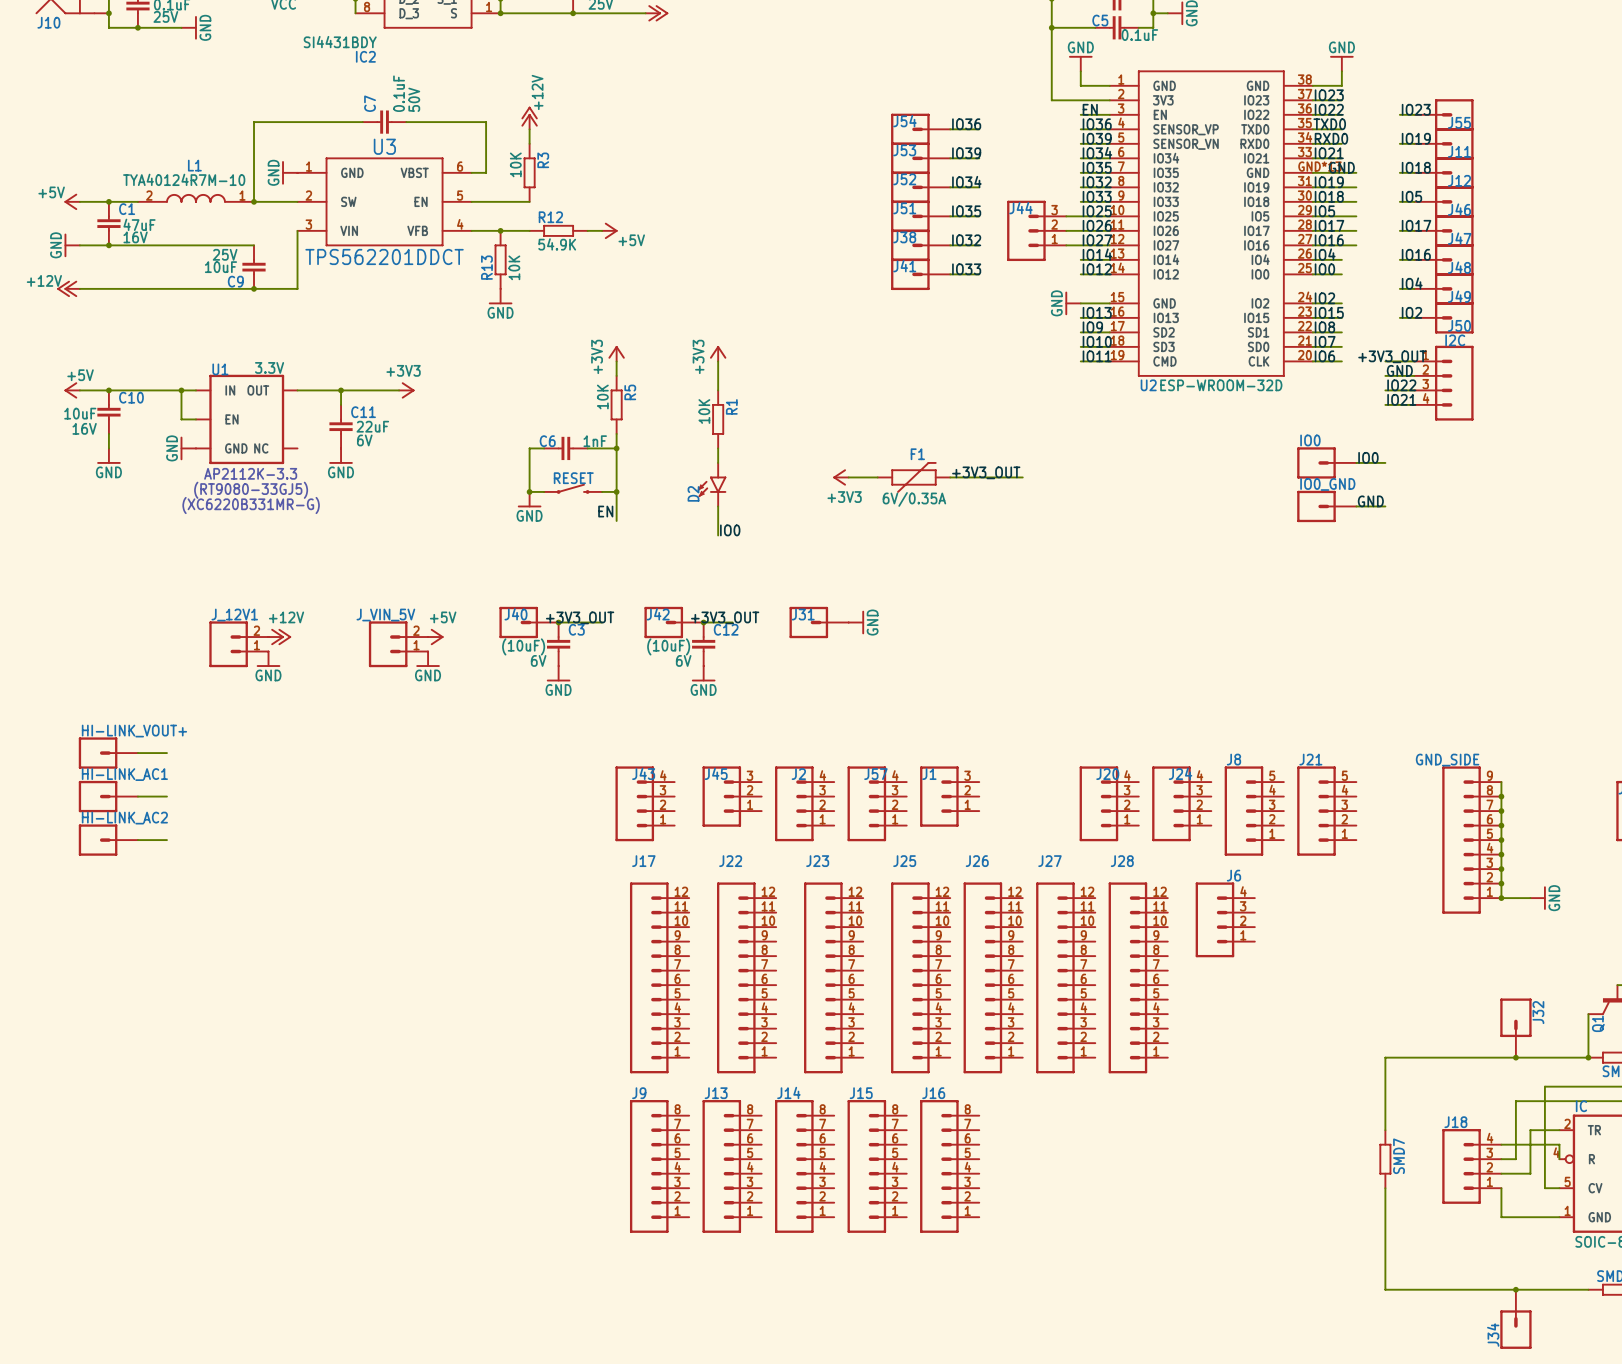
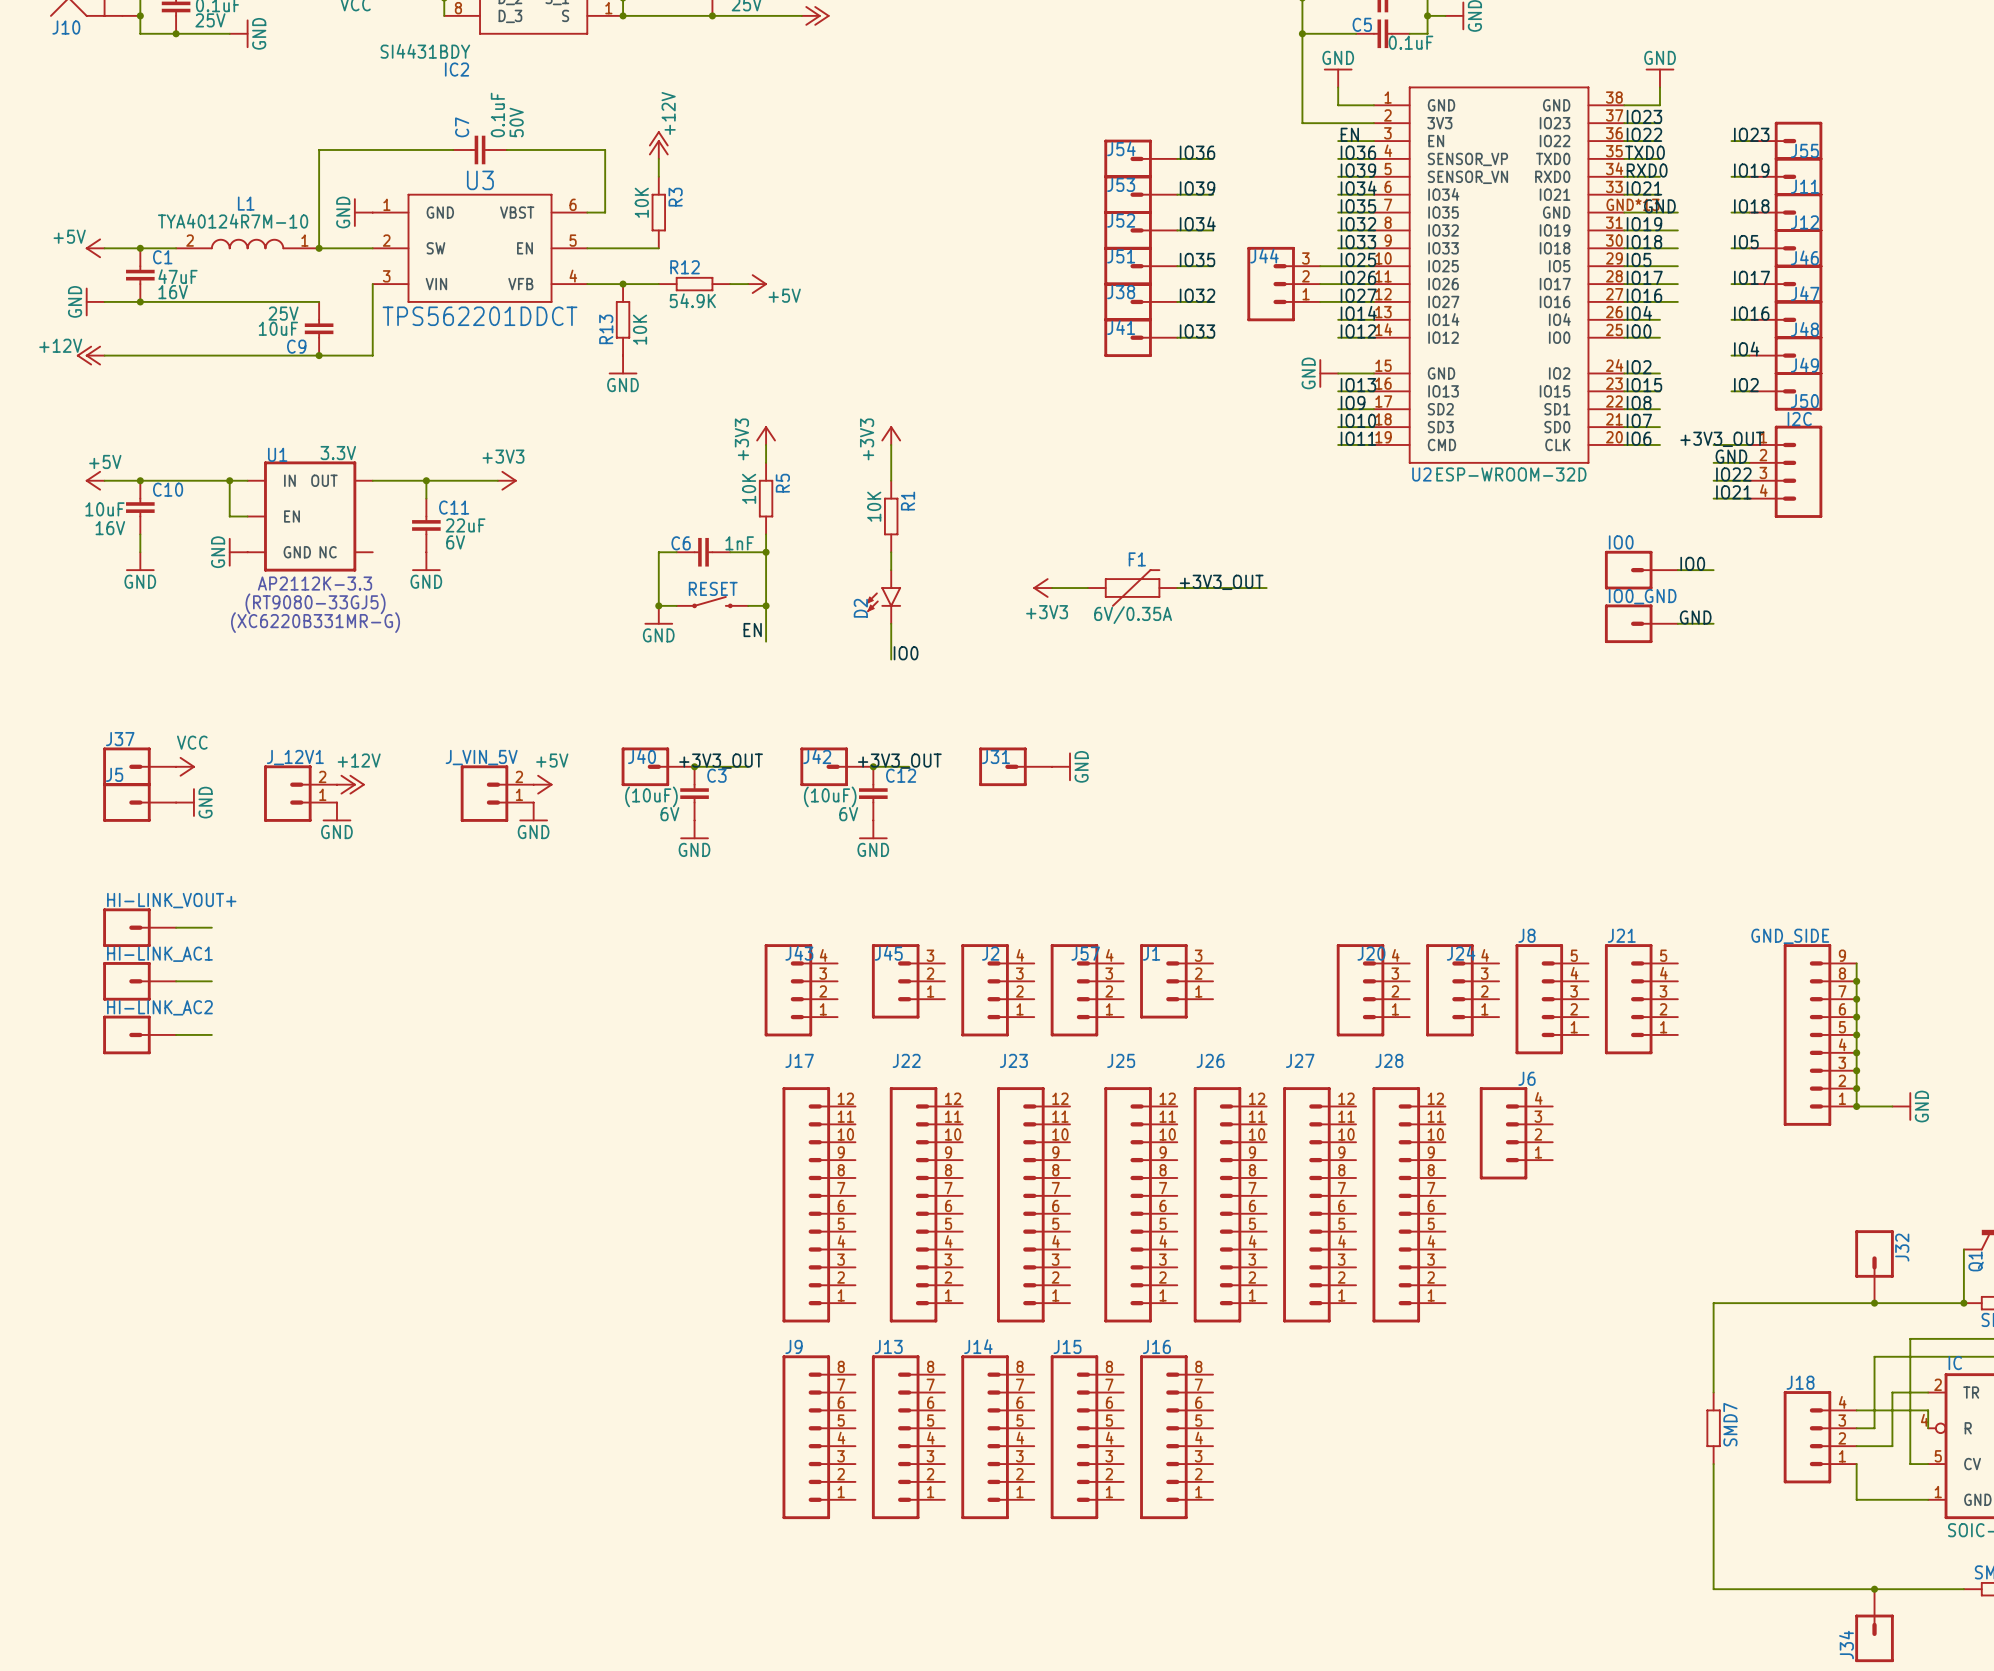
J37: none -> (139, 766)
power symbol: none -> VCC (185, 766)
J5: none -> (139, 802)
power symbol: none -> GND (185, 802)

